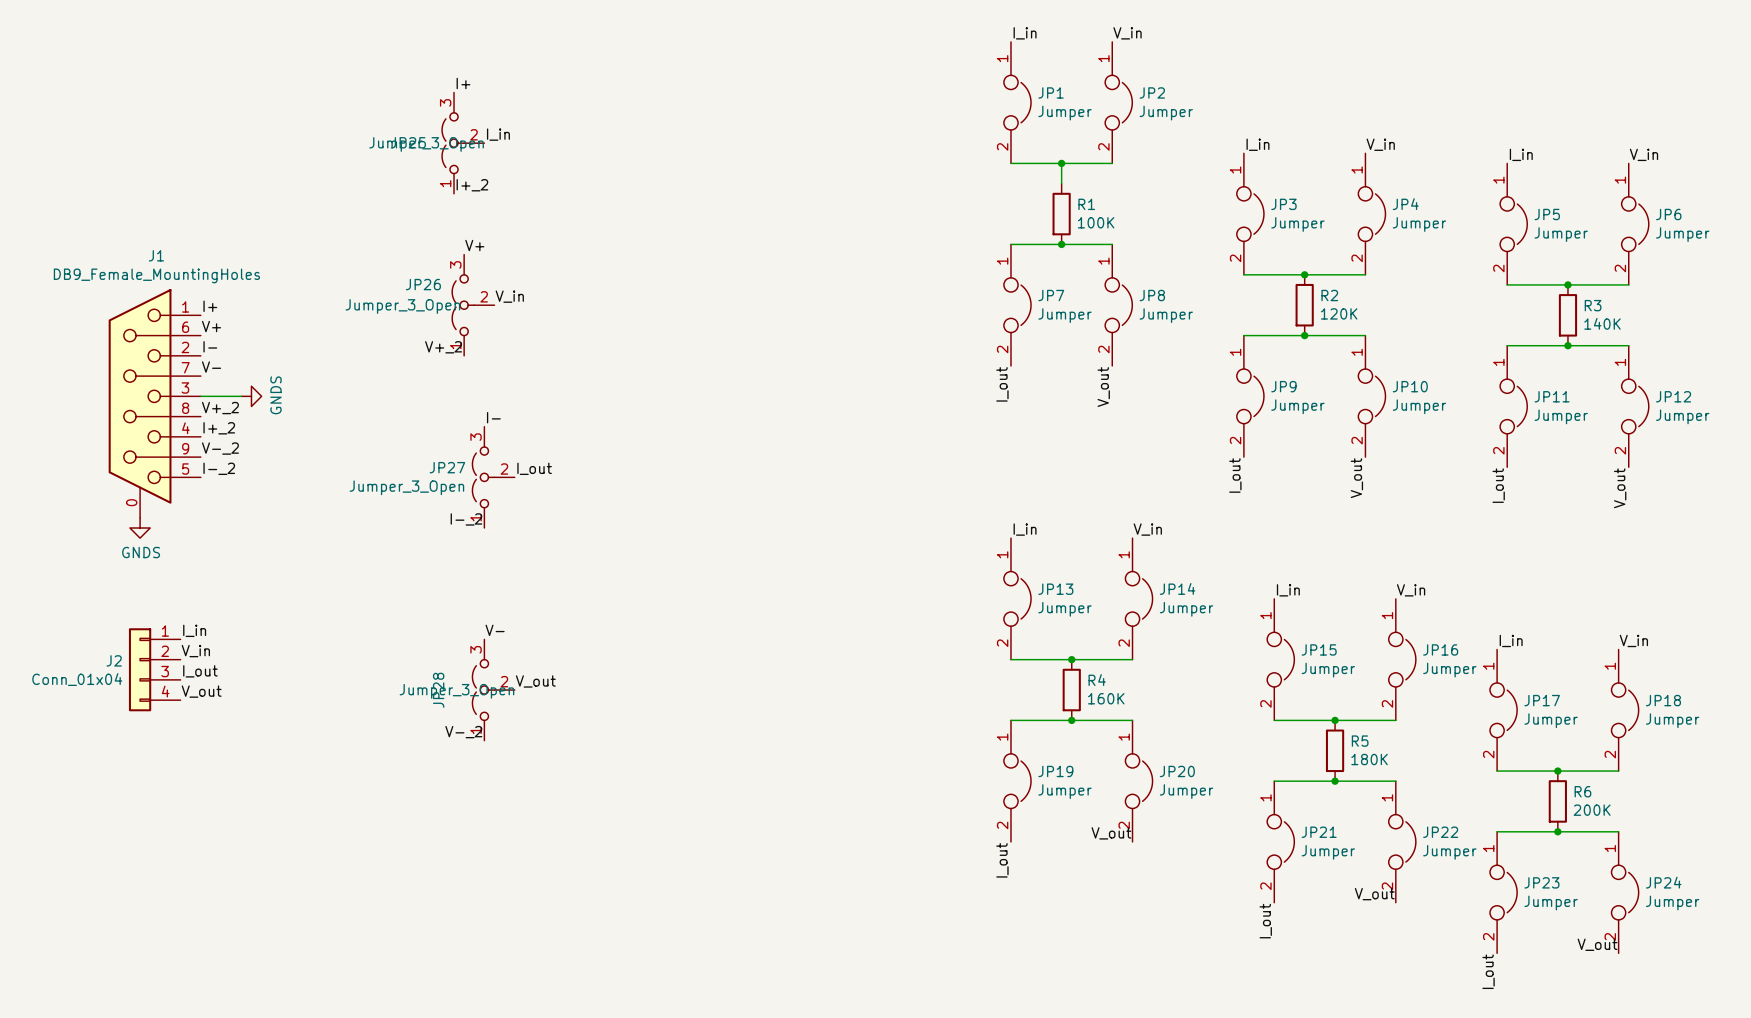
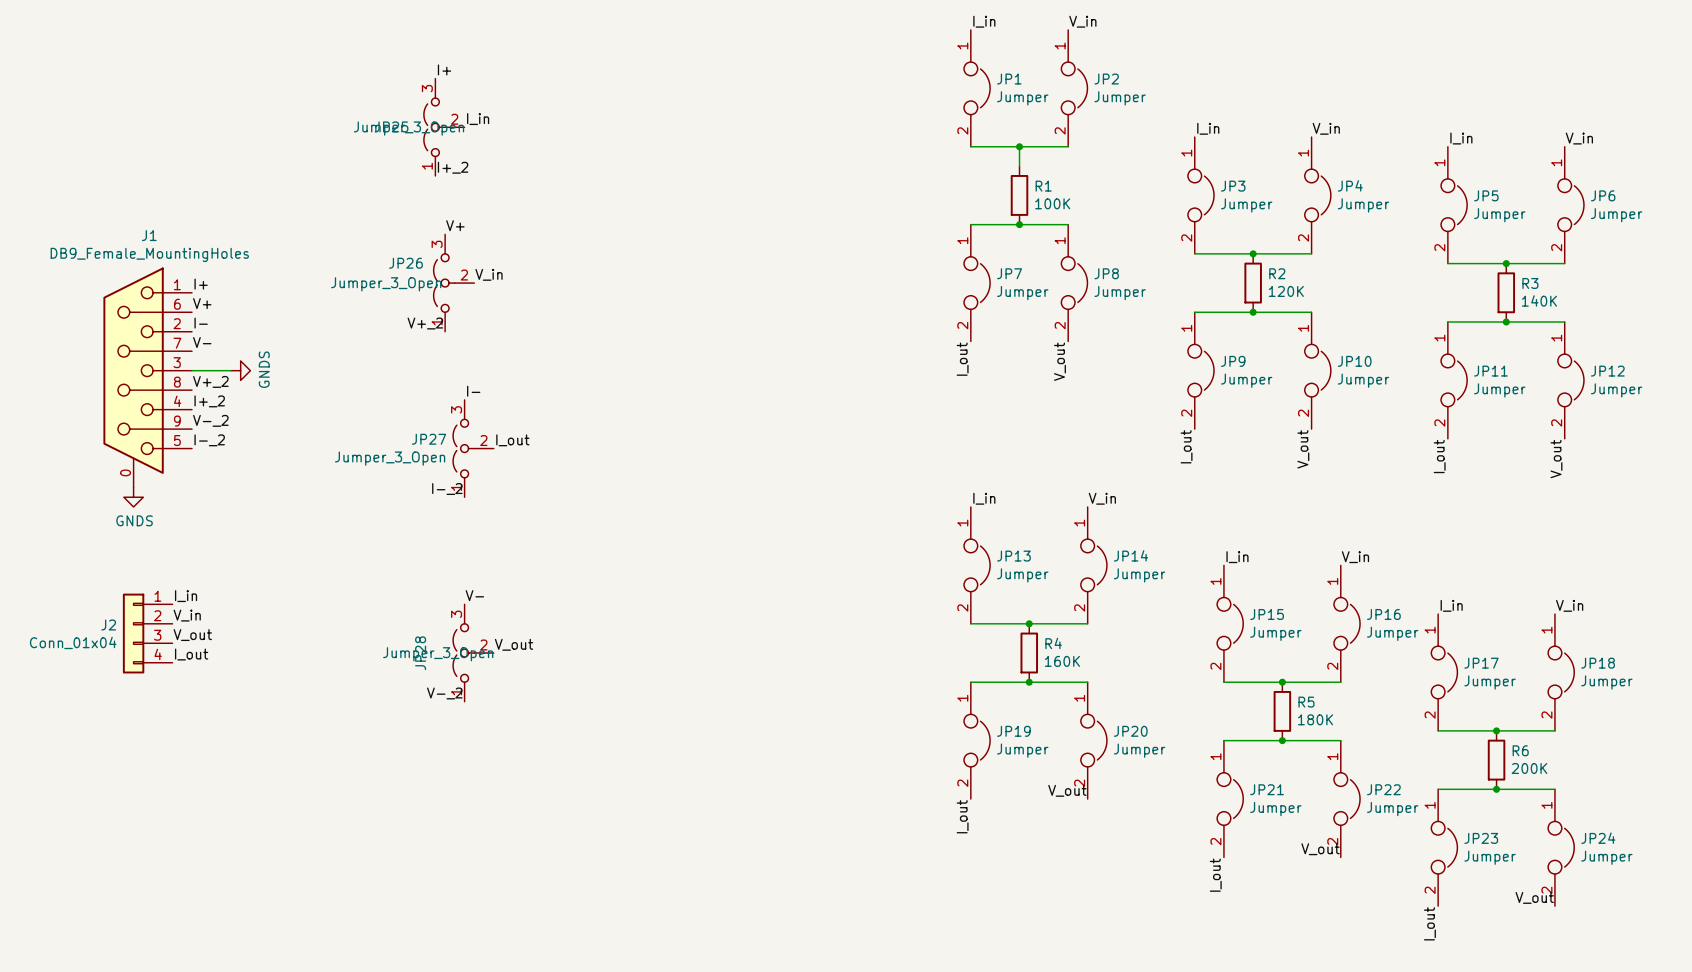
label: I_out (200, 671) -> V_out (192, 635)
label: V_out (201, 691) -> I_out (191, 654)

